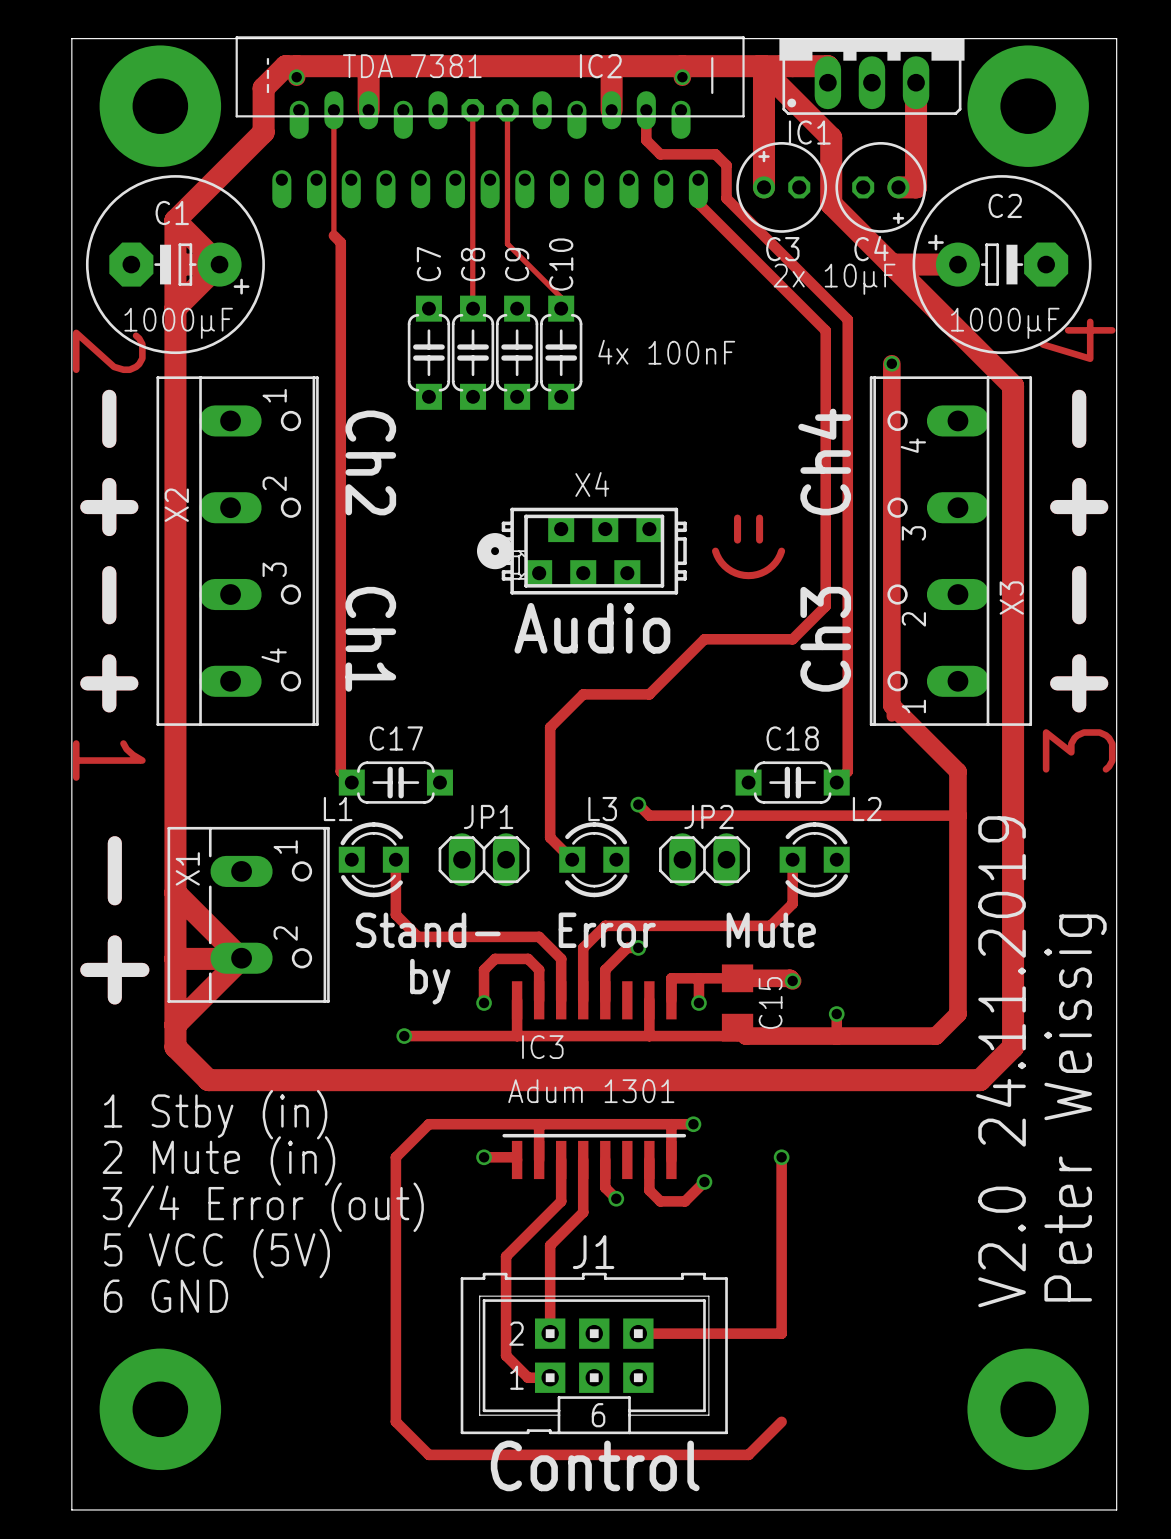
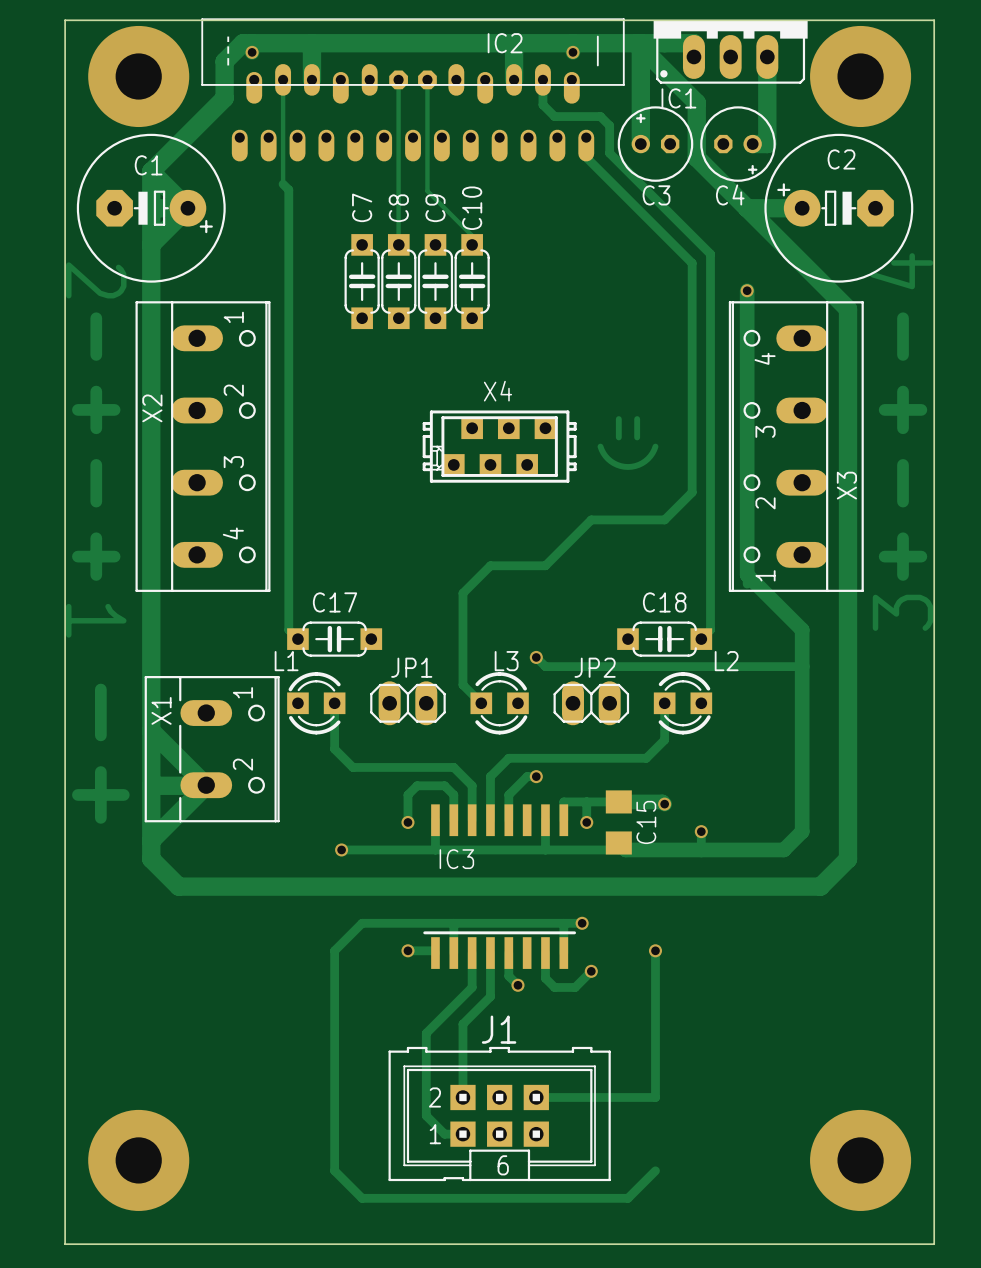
text: TDA 7381 (412, 66) -> none
text: 2x 10µF (834, 279) -> none
text: 1000µF (178, 323) -> none
text: 1000µF (1005, 323) -> none
text: 4x 100nF (666, 352) -> none
line: (109, 396) (109, 440) -> none
line: (1079, 396) (1079, 440) -> none
text: Ch2 (370, 462) -> none
text: Ch4 (824, 462) -> none
line: (109, 484) (109, 529) -> none
line: (1079, 484) (1079, 529) -> none
line: (87, 507) (131, 507) -> none
line: (1057, 507) (1101, 507) -> none
drawing: [476, 533, 514, 570] -> none
line: (109, 573) (109, 617) -> none
line: (1079, 573) (1079, 617) -> none
text: Audio (592, 628) -> none
text: Ch1 (370, 639) -> none
text: Ch3 (825, 639) -> none
line: (109, 661) (109, 705) -> none
line: (1079, 661) (1079, 705) -> none
line: (87, 683) (131, 683) -> none
line: (1057, 683) (1101, 683) -> none
line: (114, 843) (114, 898) -> none
text: Stand- (428, 930) -> none
text: Error (607, 930) -> none
text: Mute (771, 930) -> none
line: (114, 942) (114, 997) -> none
line: (87, 969) (142, 969) -> none
text: by (430, 981) -> none
text: V2.0 24.11.2019 (1001, 1061) -> none
text: Adum 1301 (591, 1091) -> none
text: Peter Weissig (1075, 1108) -> none
text: 1 Stby (in) (215, 1114) -> none
text: 2 Mute (in) (218, 1160) -> none
text: 3/4 Error (out) (263, 1207) -> none
text: 5 VCC (5V) (216, 1253) -> none
text: 6 GND (166, 1296) -> none
text: Control (595, 1465) -> none

